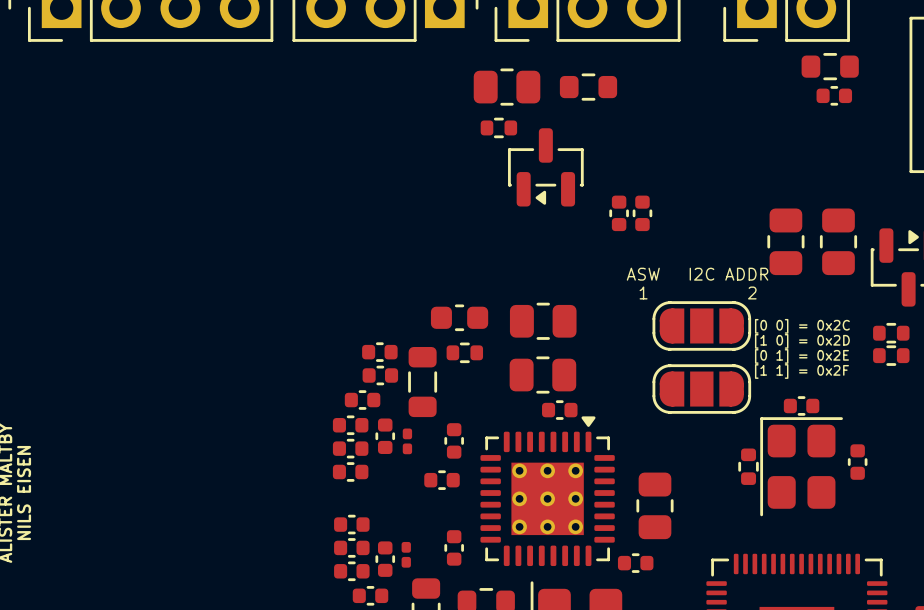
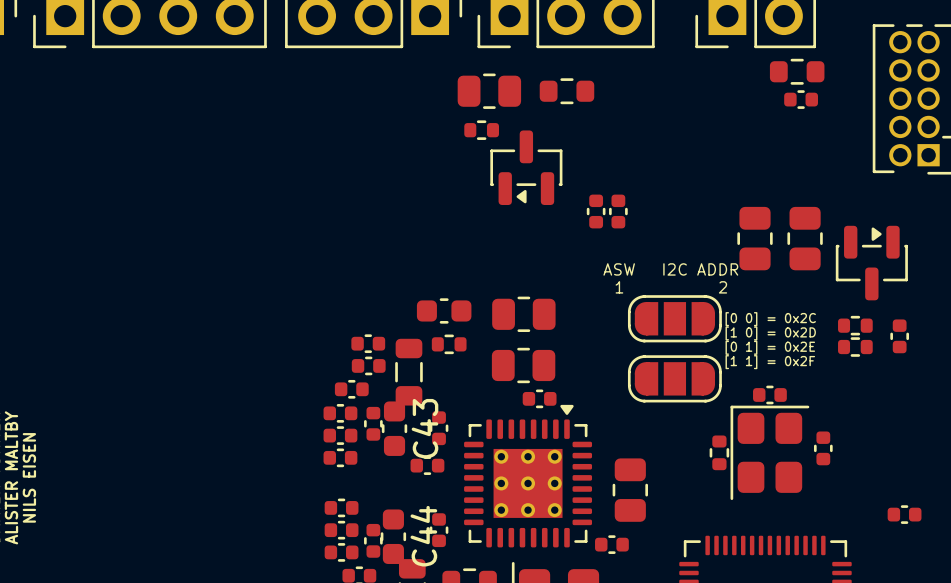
part: (407, 441) -> none
C43: none -> (394, 428)
part: (406, 554) -> none
C44: none -> (393, 536)

